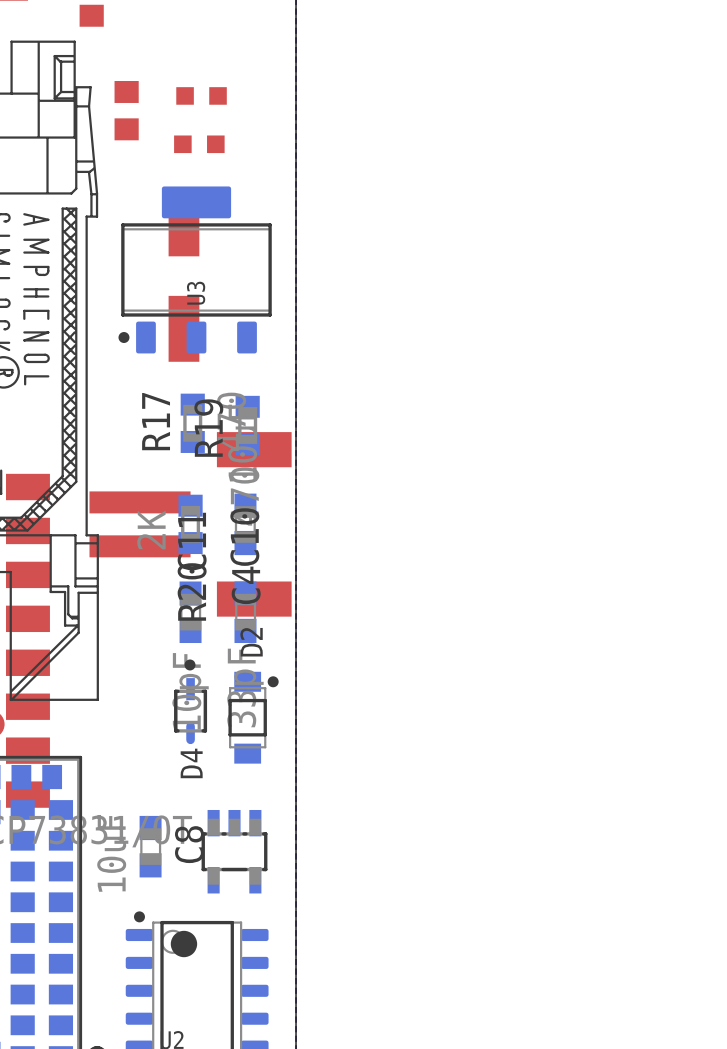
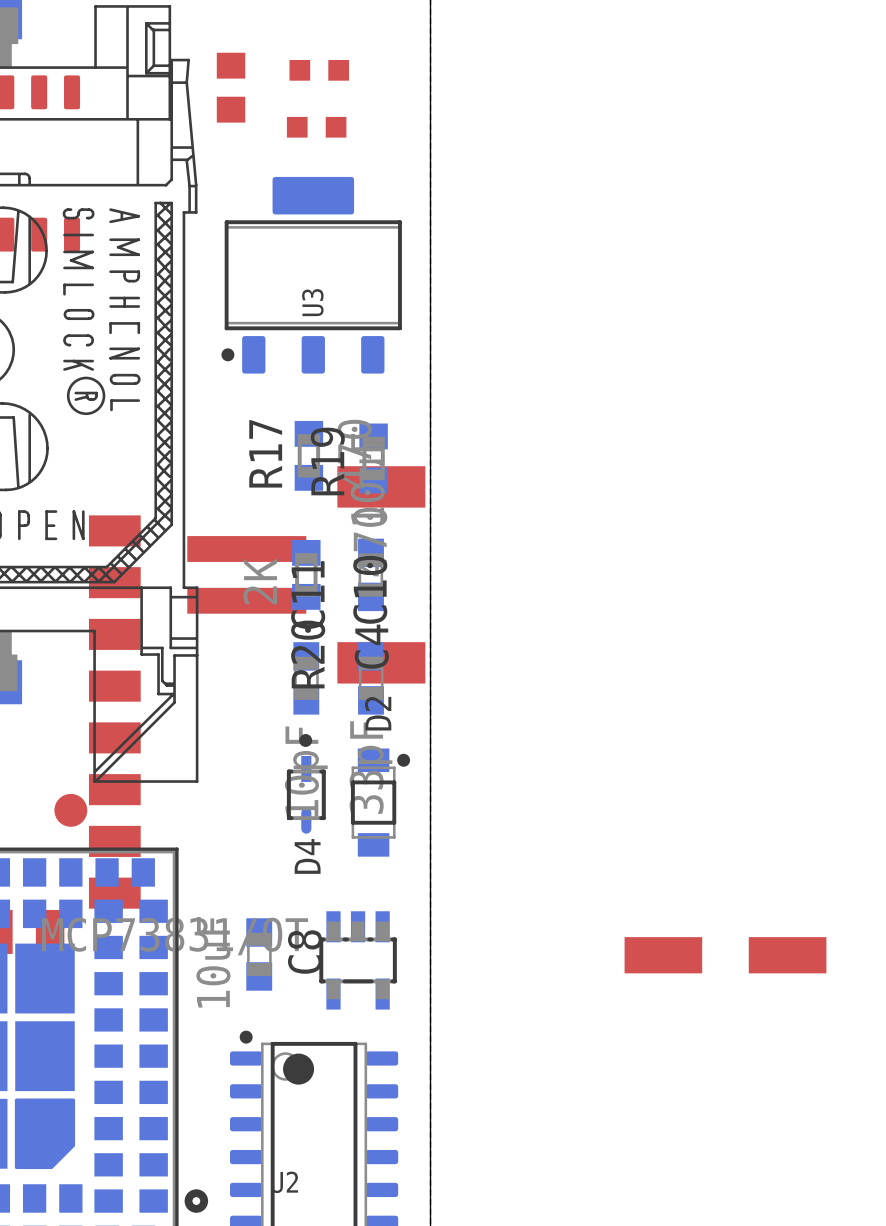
part: (183, 276) -> none
part: none -> (725, 955)

